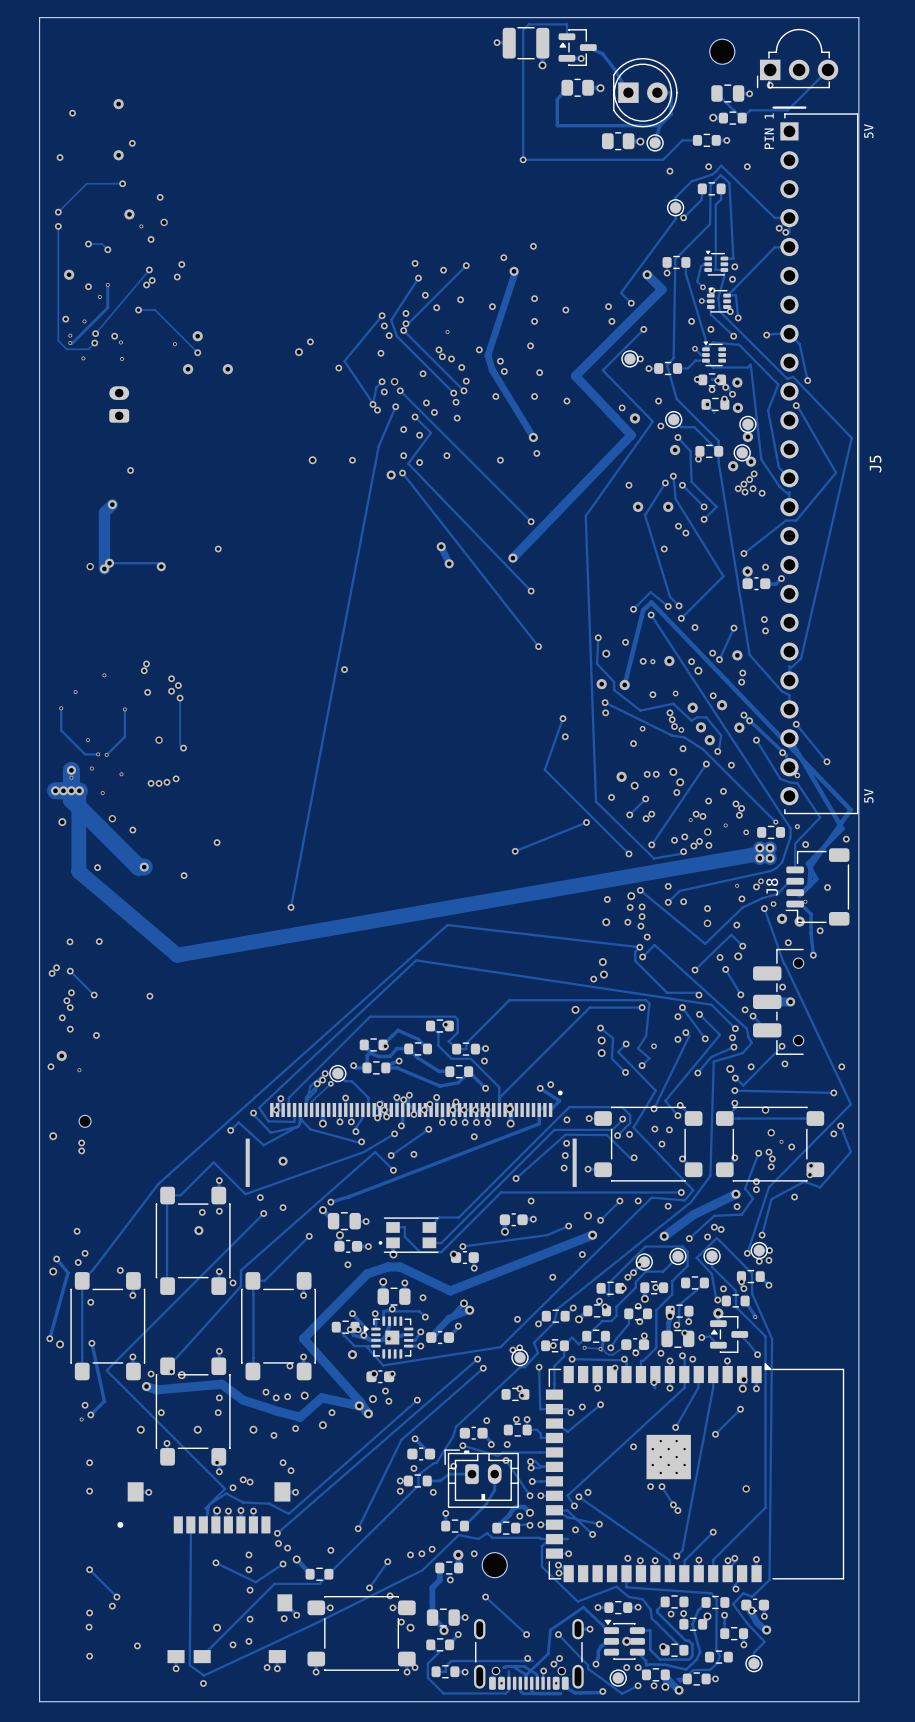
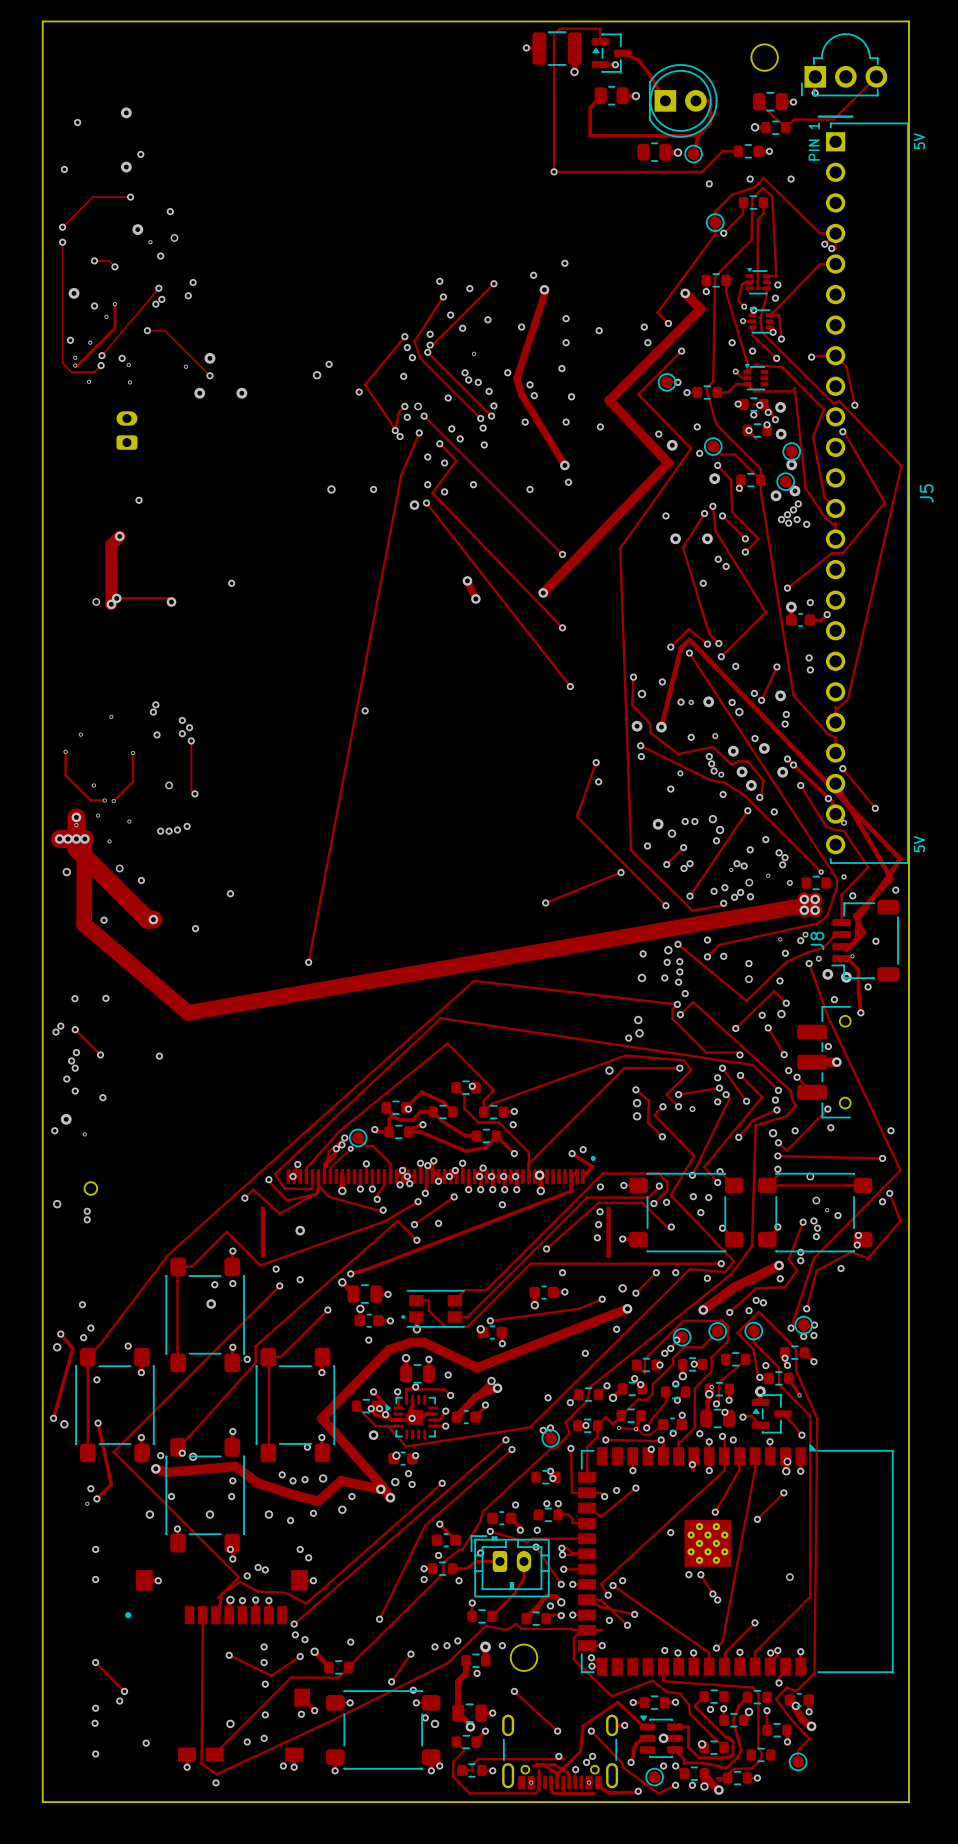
track: none -> (719, 1088) (678, 1094)
via: none -> (719, 1088)
via: none -> (678, 1094)
track: none -> (678, 1106) (666, 1094) (691, 1070) (684, 1060) (625, 1055) (492, 1103) (483, 1112) (483, 1100) (493, 1090) (447, 1043) (339, 1131) (307, 1166) (306, 1170)
via: none -> (678, 1106)
track: (642, 1065) (649, 1058) (638, 1048) (646, 1036) (649, 1003) (646, 1000) (509, 1000) (466, 1043) (466, 1049) (456, 1049) (448, 1041) (457, 1032) (457, 1019) (454, 1016) (370, 1016) (288, 1098) (288, 1109) -> none
via: (642, 1065) -> none

